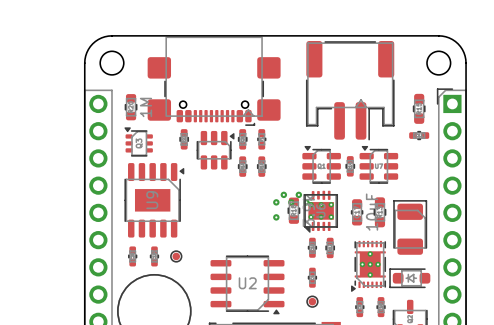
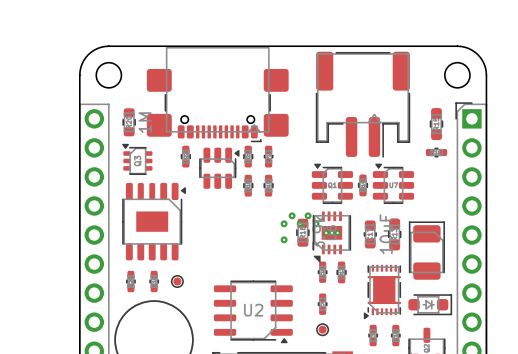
part footprint: [303, 190, 338, 233] -> [312, 211, 352, 263]
part: (154, 200) -> none
part: none -> (154, 221)
part footprint: [351, 240, 386, 292] -> [363, 264, 401, 320]
part rotation: 0° (409, 278) -> 180° (430, 304)

